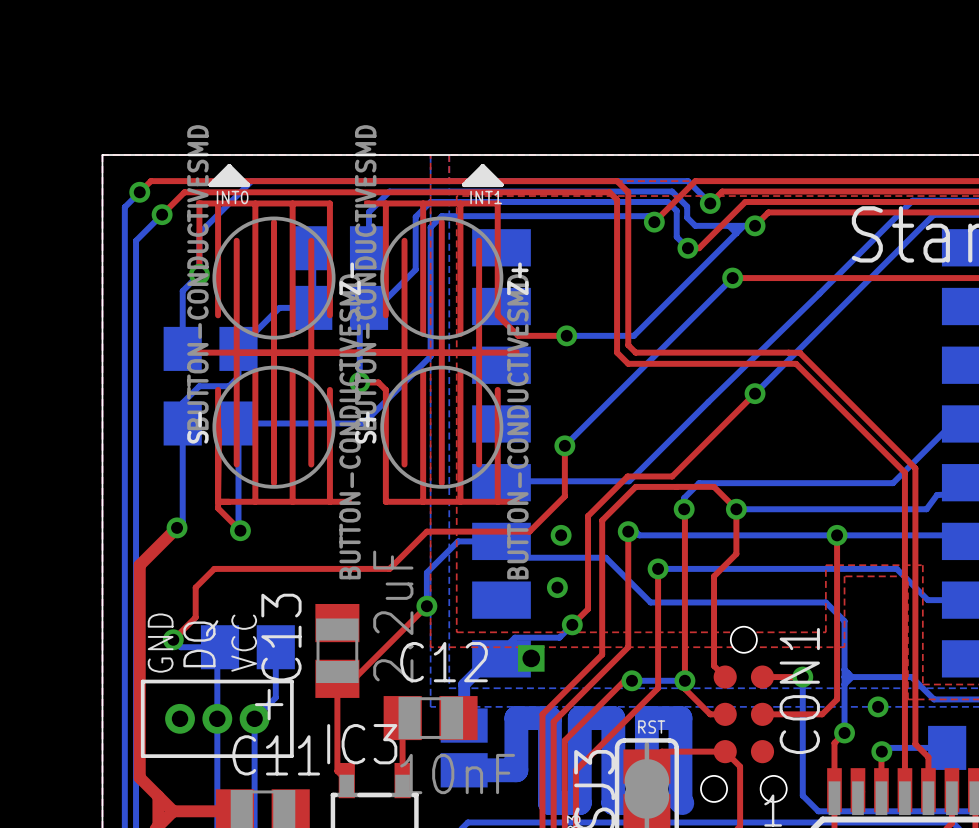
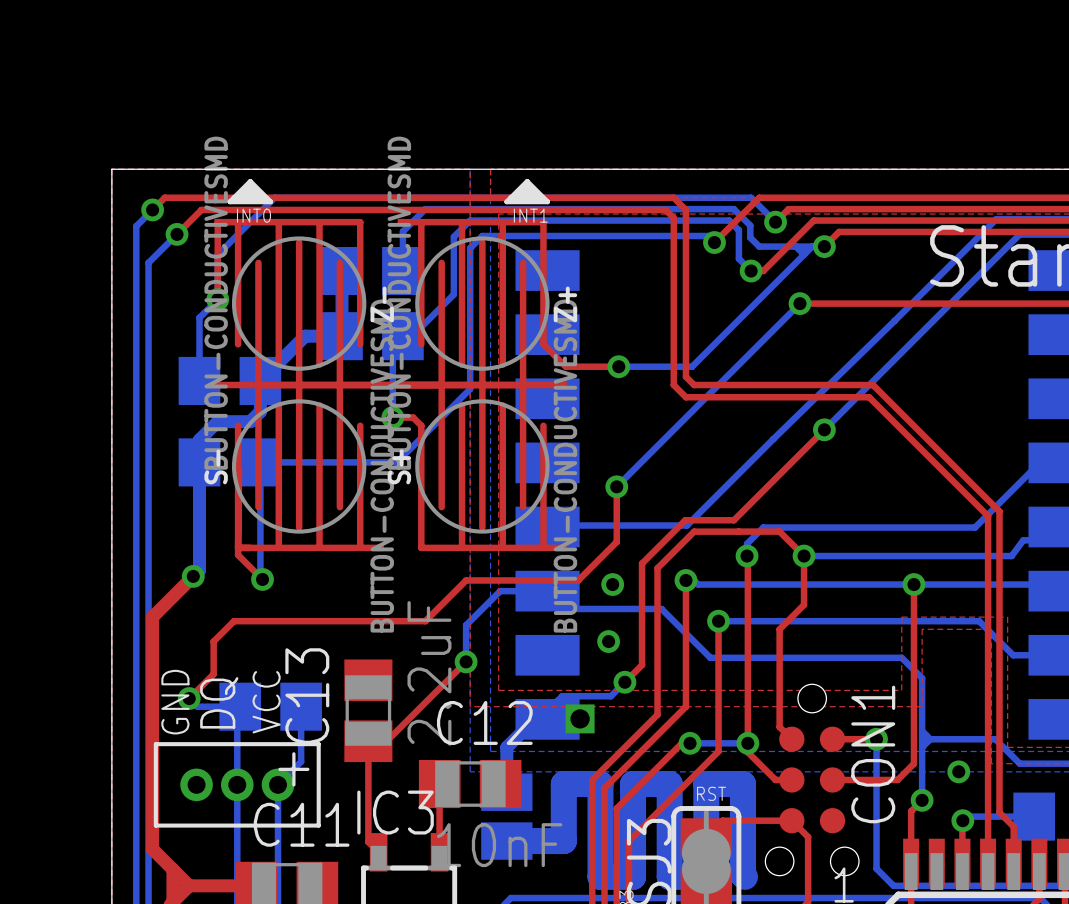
bottom track width: thin (313, 248) (313, 307) (279, 307) (238, 348) (238, 376) (229, 386) (199, 386) (182, 402) (182, 522) (177, 527) -> thick (342, 271) (342, 336) (305, 336) (260, 380) (260, 411) (250, 421) (217, 421) (199, 439) (199, 570) (193, 576)

